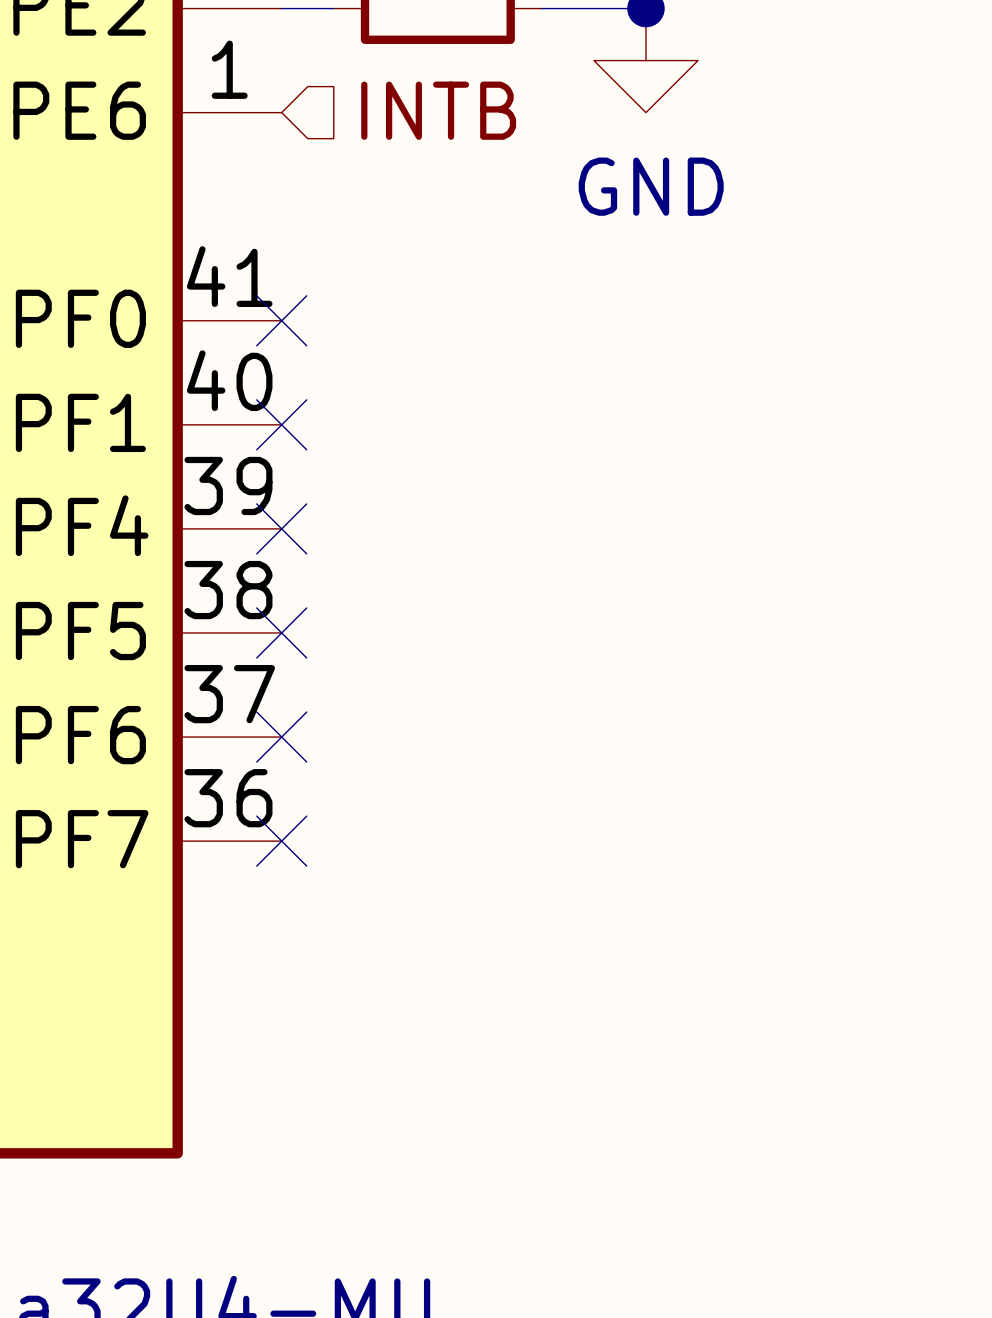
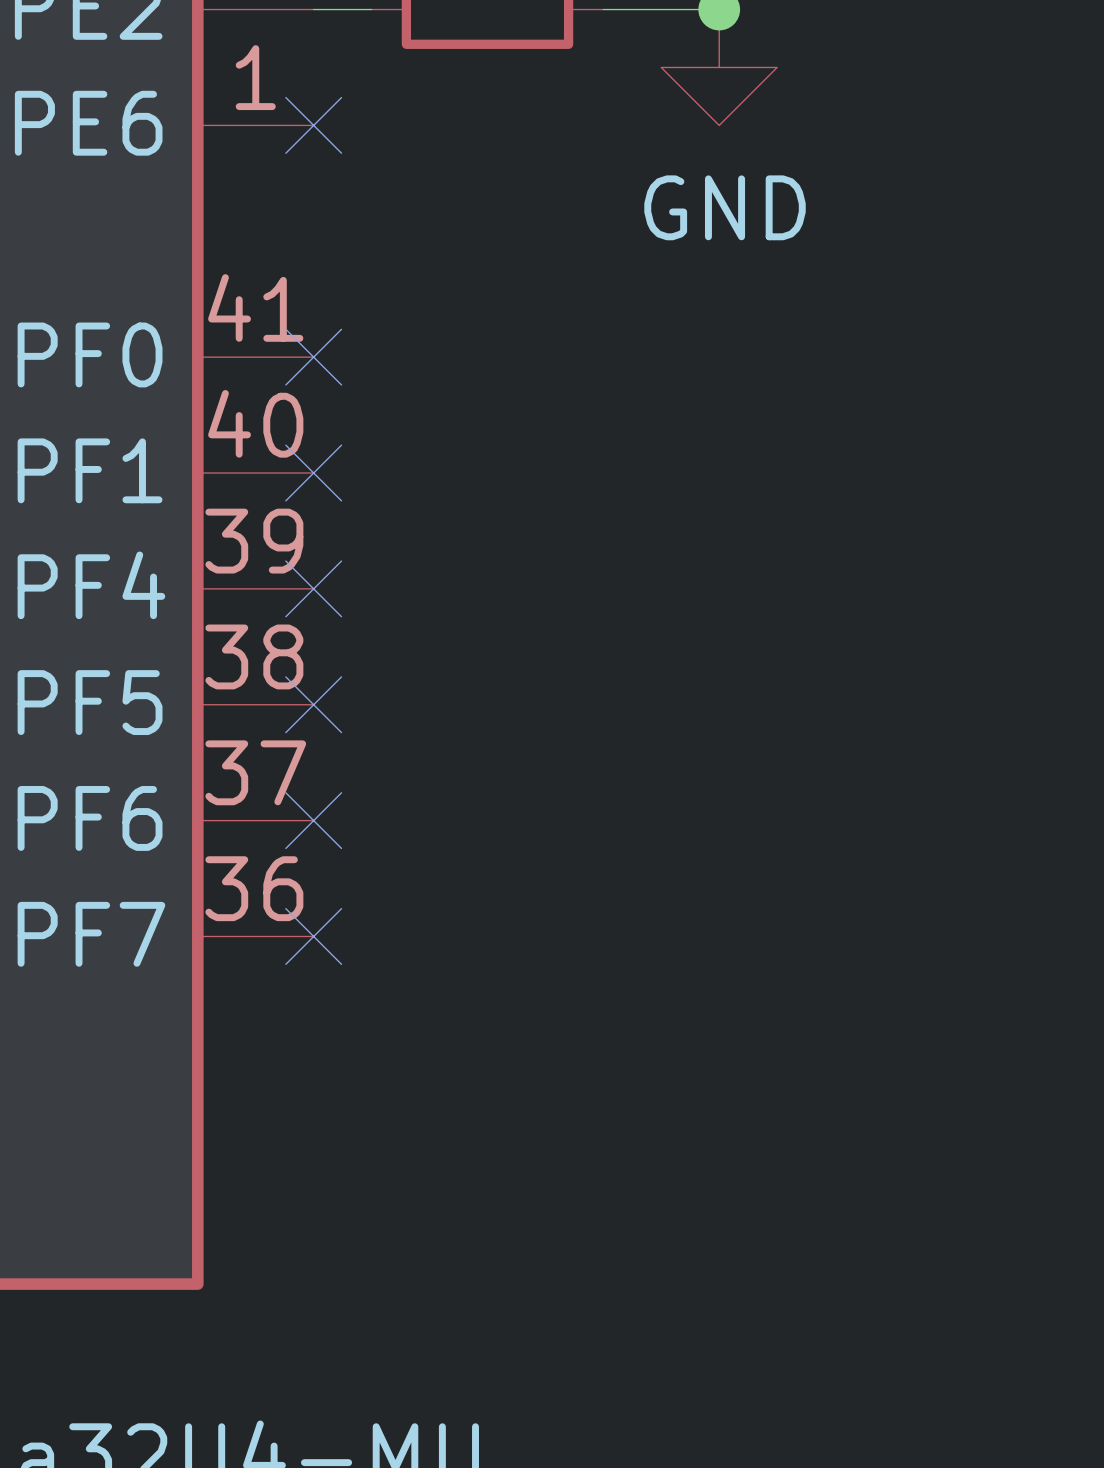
hierarchical label: INTB (438, 110) -> none
no-connect mark: none -> (313, 125)

